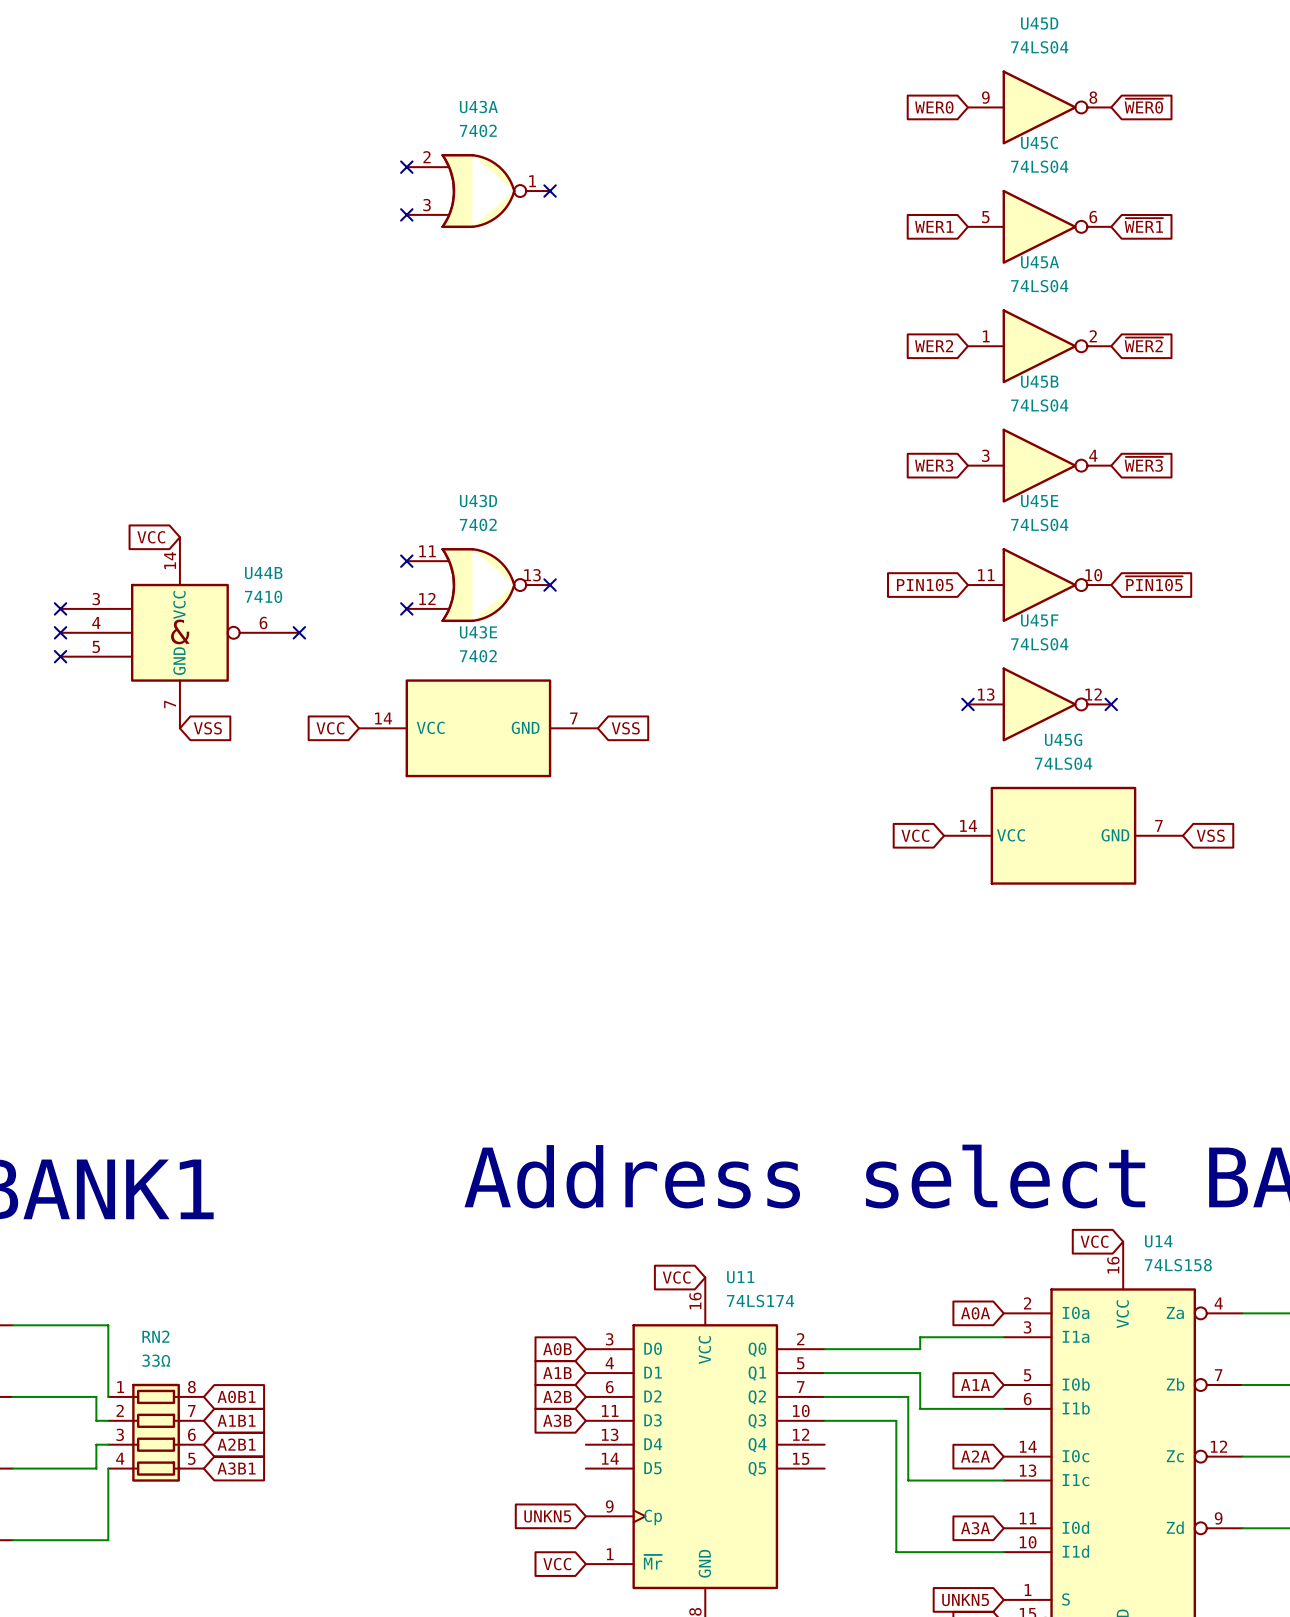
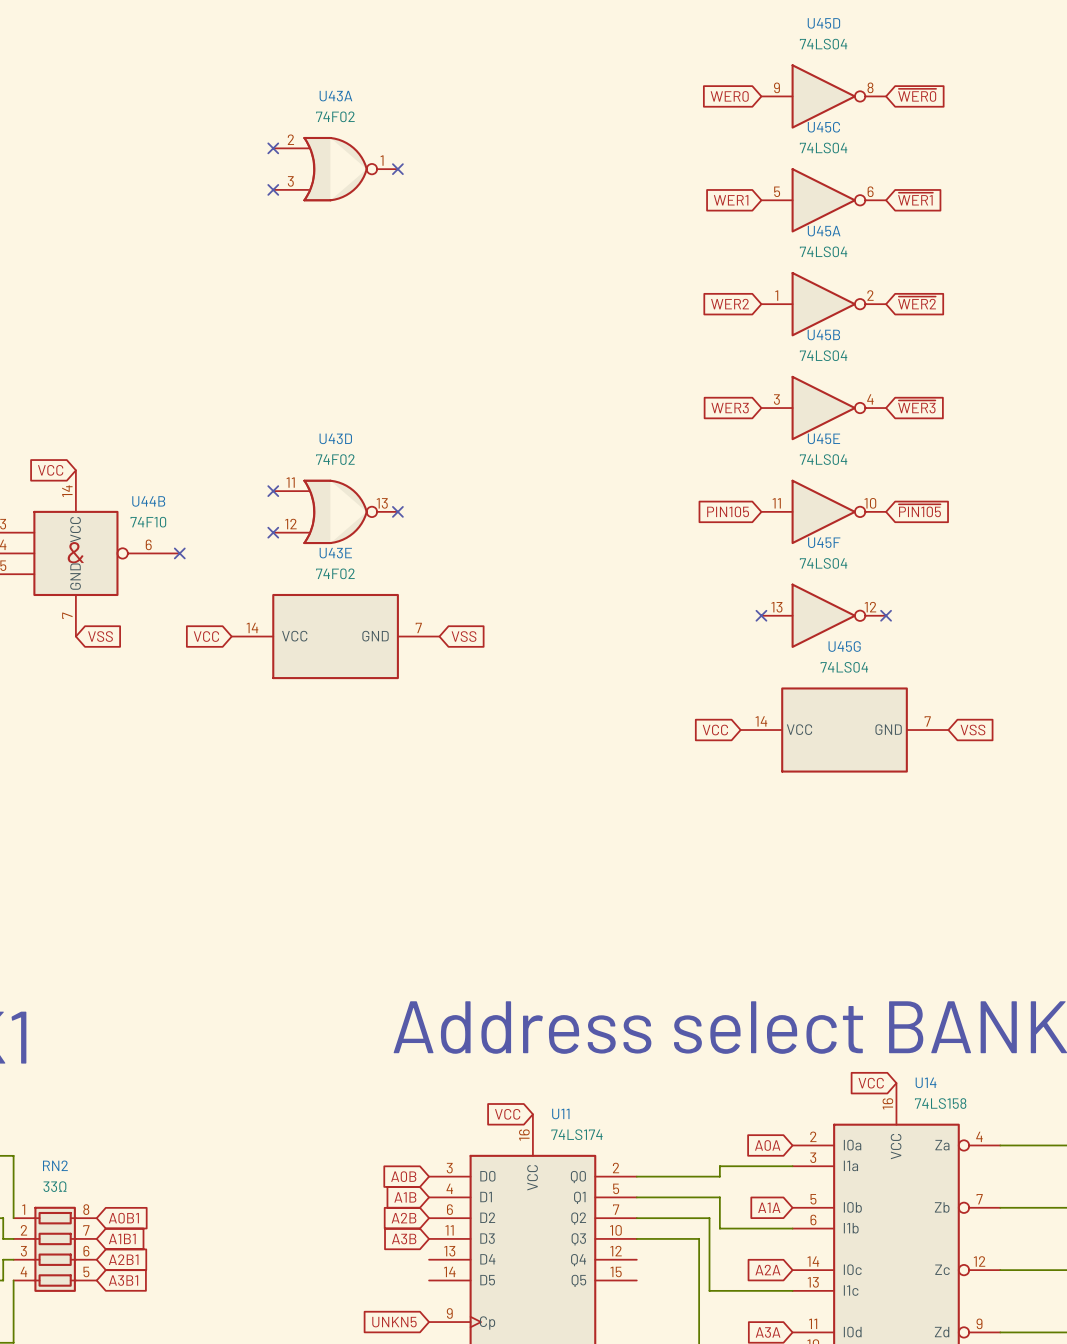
U43A value: 7402 (478, 130) -> 74F02 (335, 116)
U43D value: 7402 (478, 524) -> 74F02 (335, 459)
U44B value: 7410 (263, 596) -> 74F10 (148, 522)
U43E value: 7402 (478, 656) -> 74F02 (335, 573)

